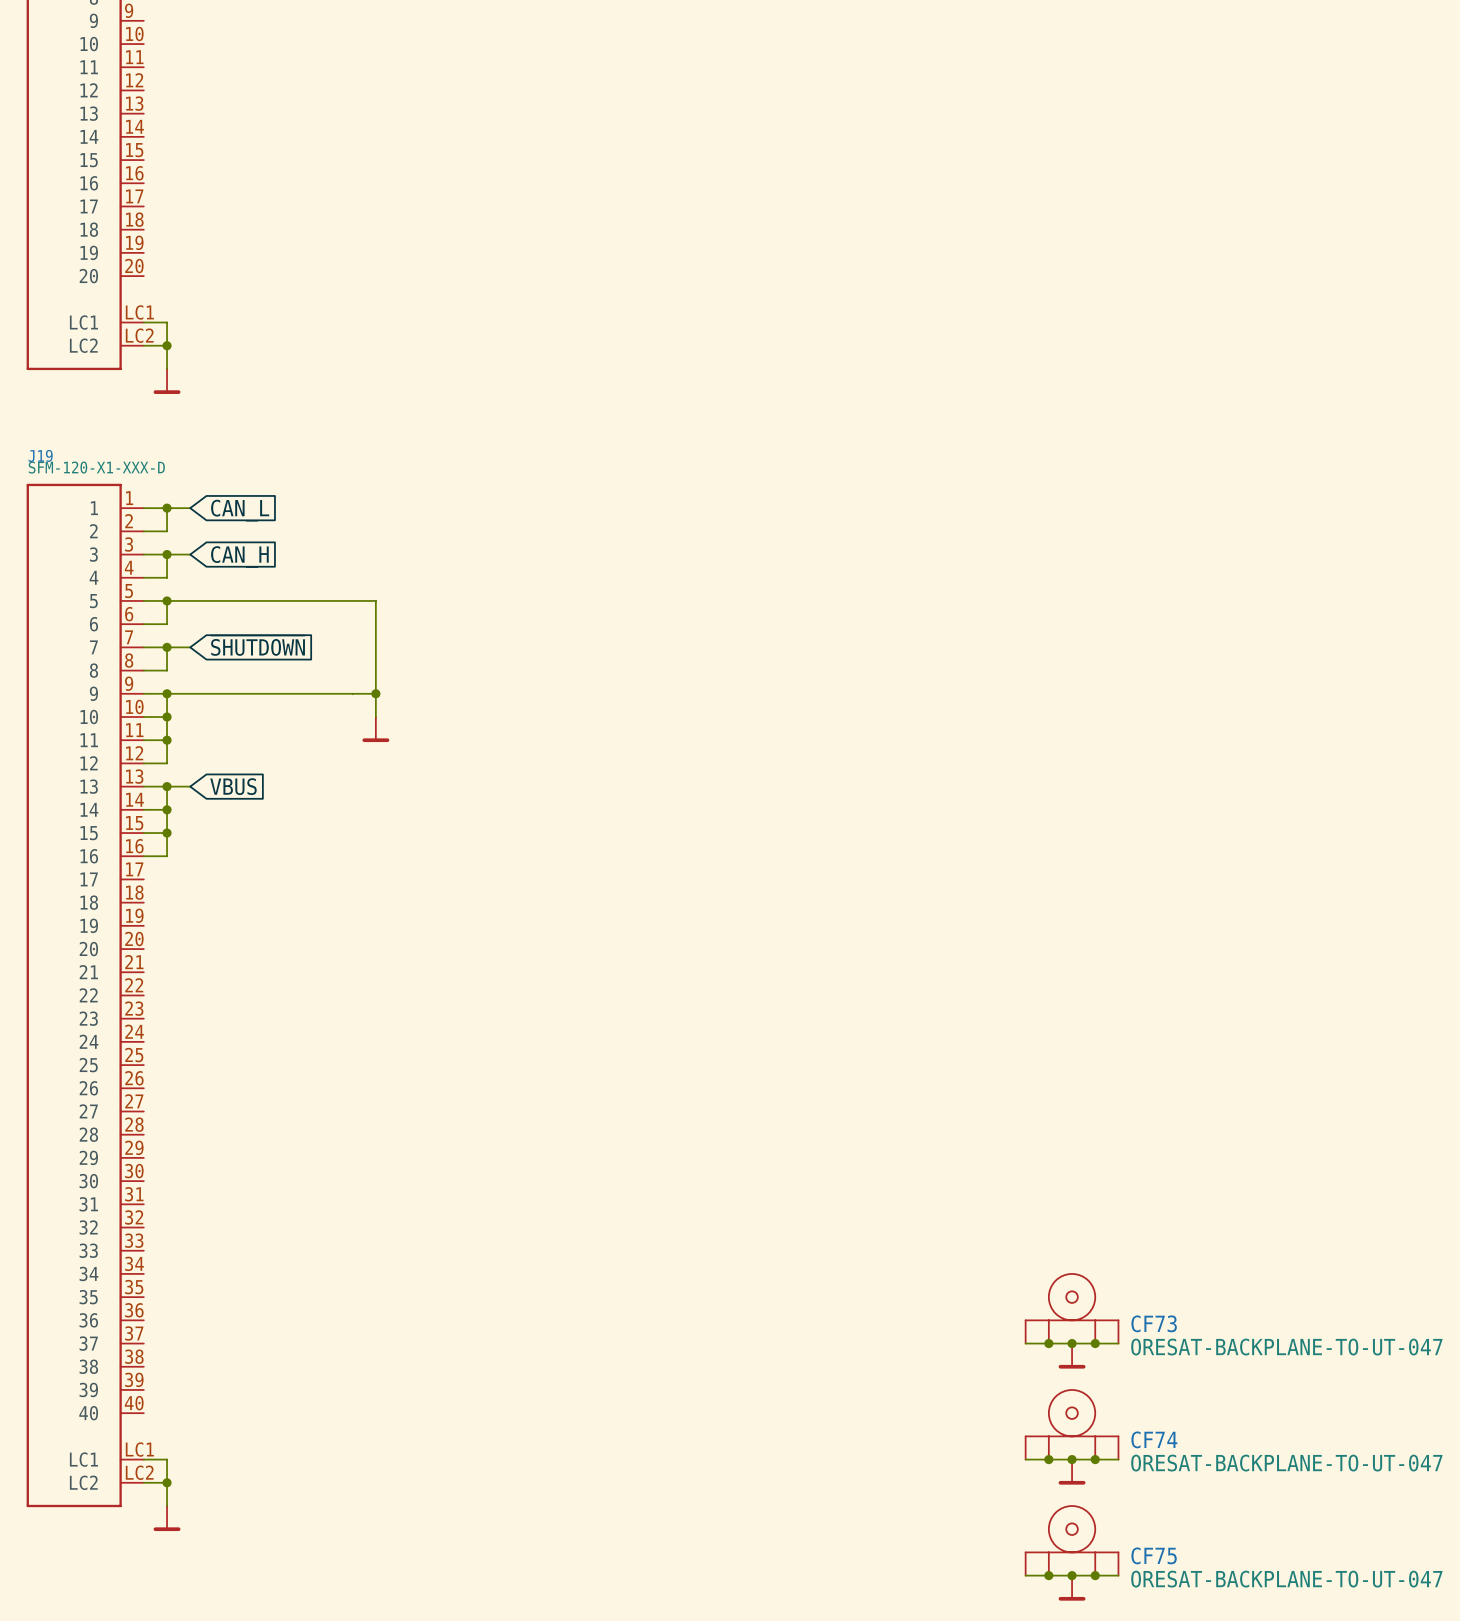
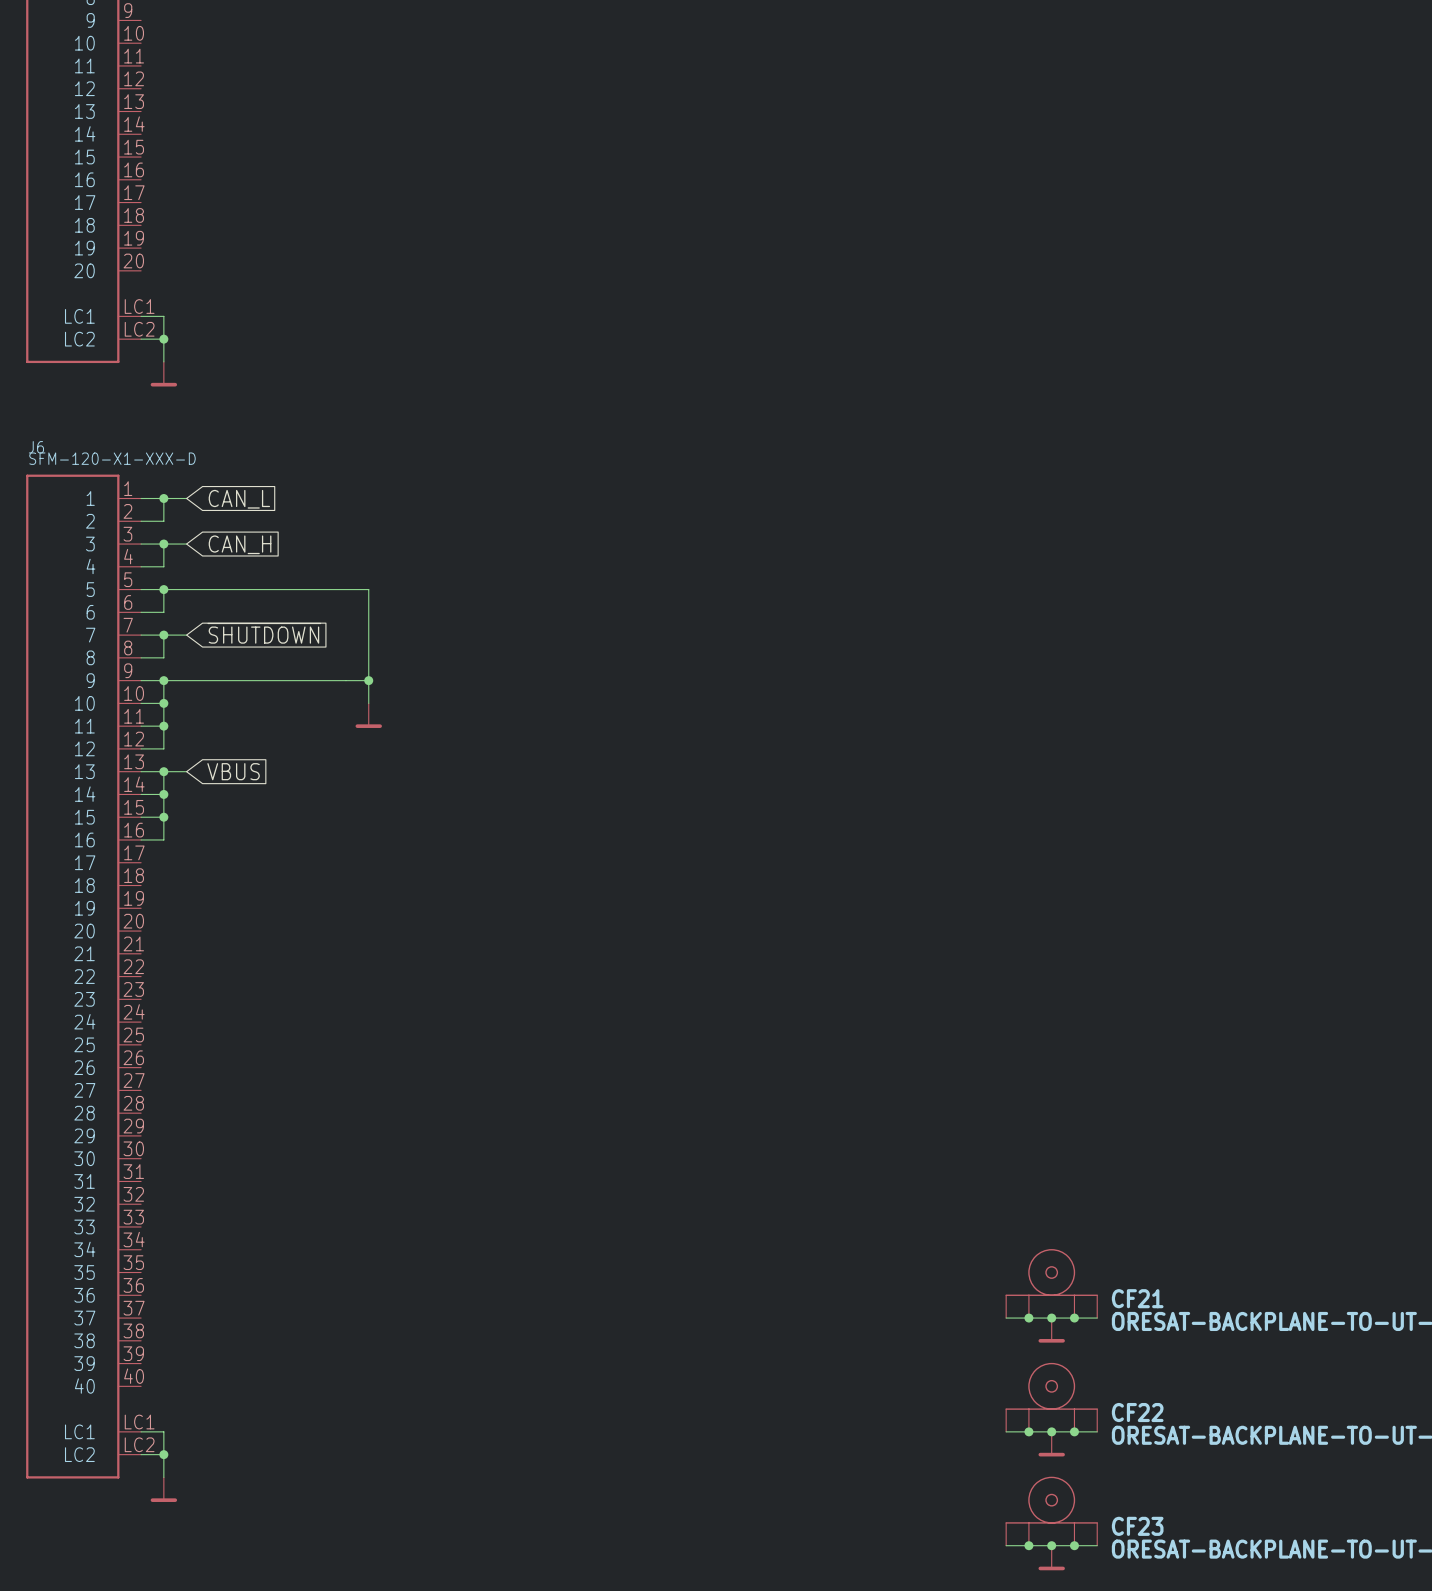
J19 name: J19 (40, 455) -> J6 (36, 447)
CF73 name: CF73 (1154, 1323) -> CF21 (1137, 1298)
CF74 name: CF74 (1154, 1439) -> CF22 (1137, 1412)
CF75 name: CF75 (1154, 1555) -> CF23 (1137, 1526)

